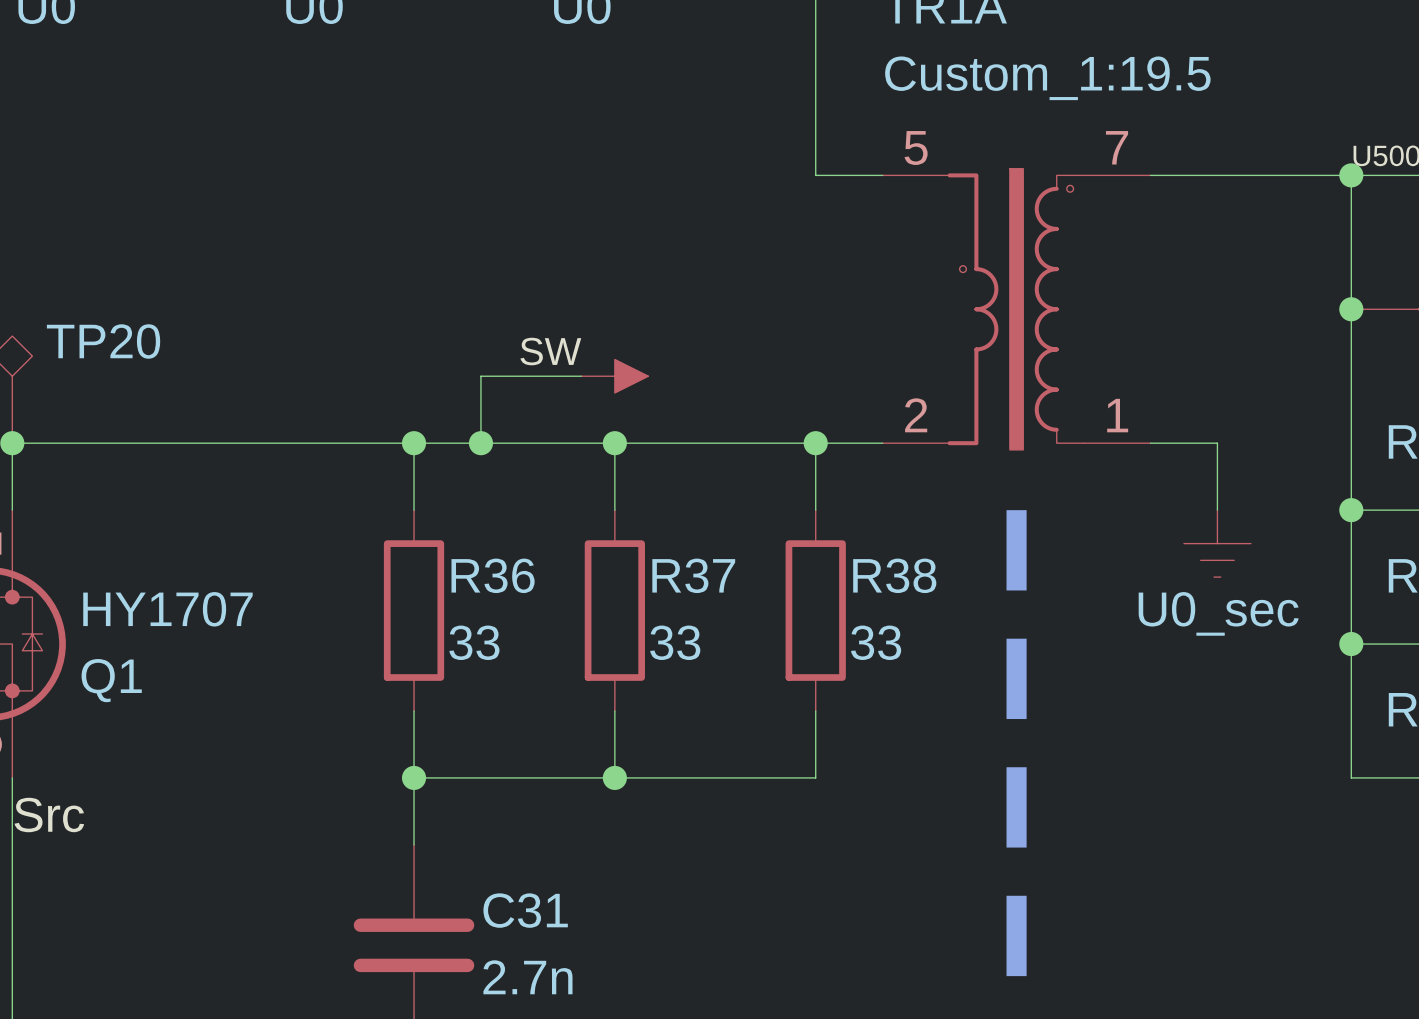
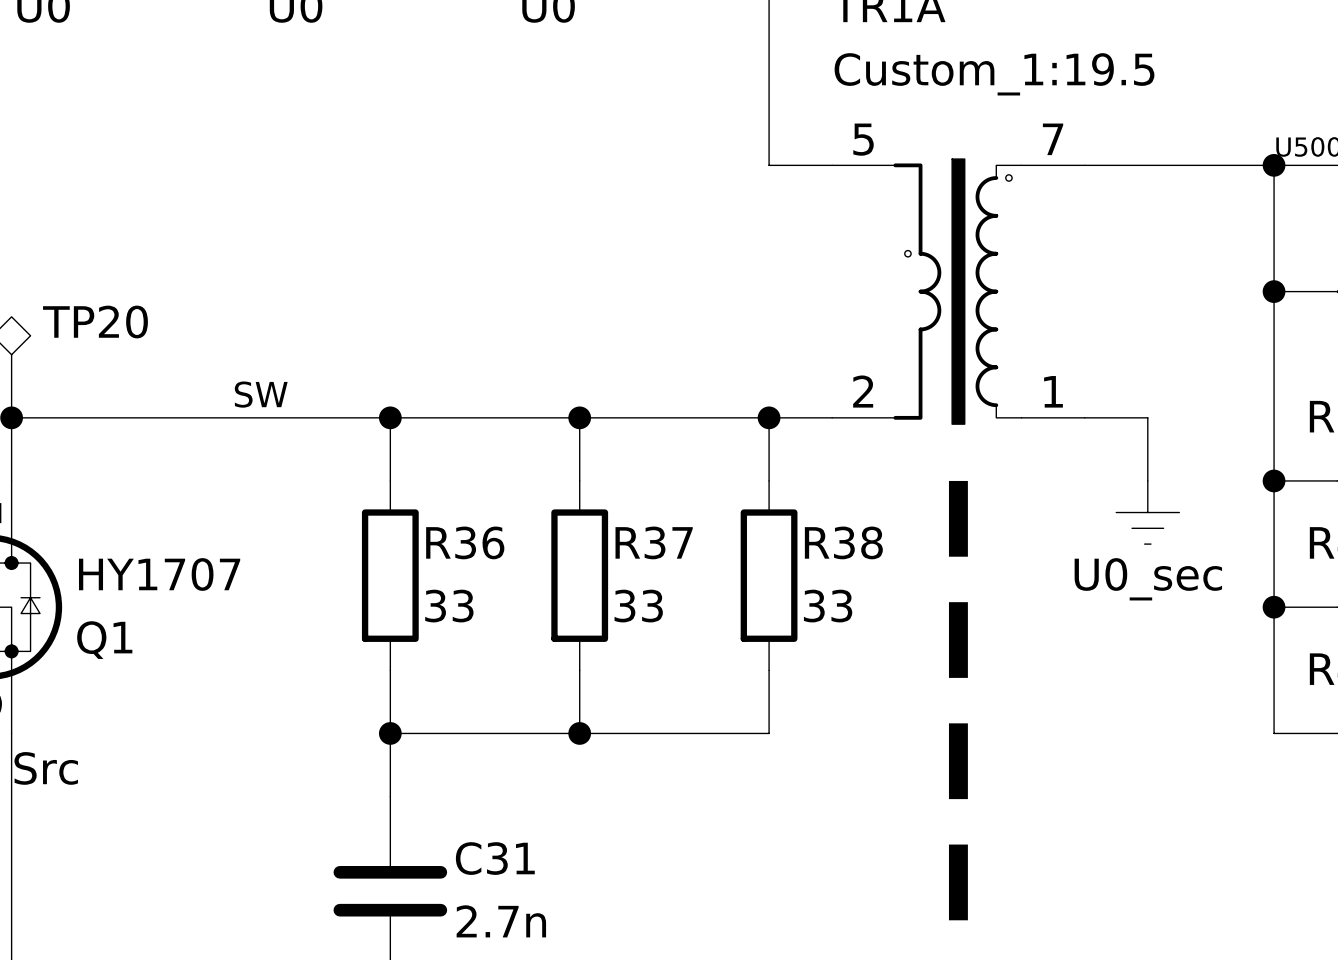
label position: SW (550, 351) -> SW (261, 394)
wire: (581, 376) (480, 376) (480, 443) -> none
part: (615, 376) -> none
junction: (480, 443) -> none

